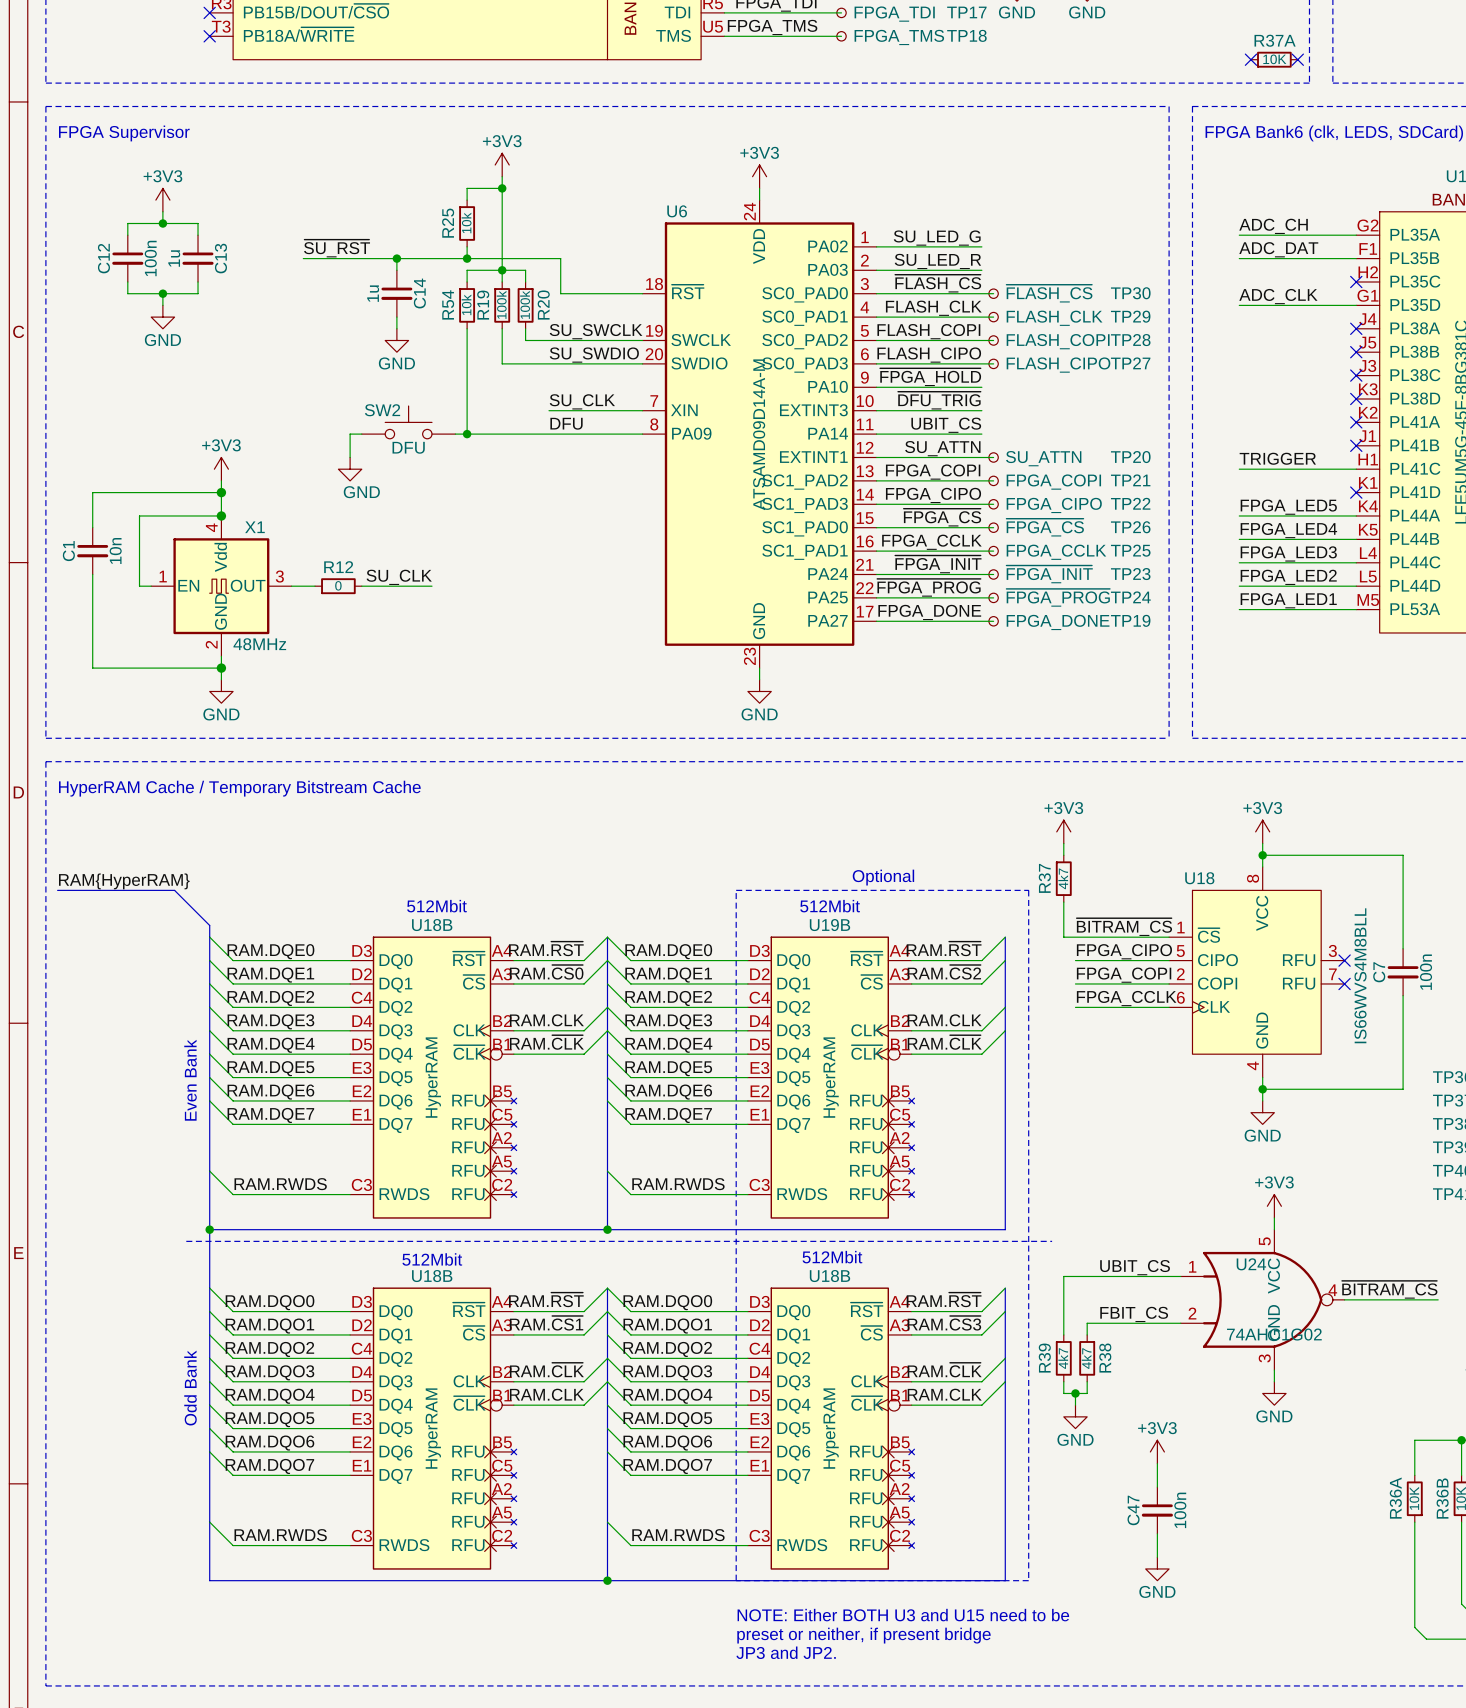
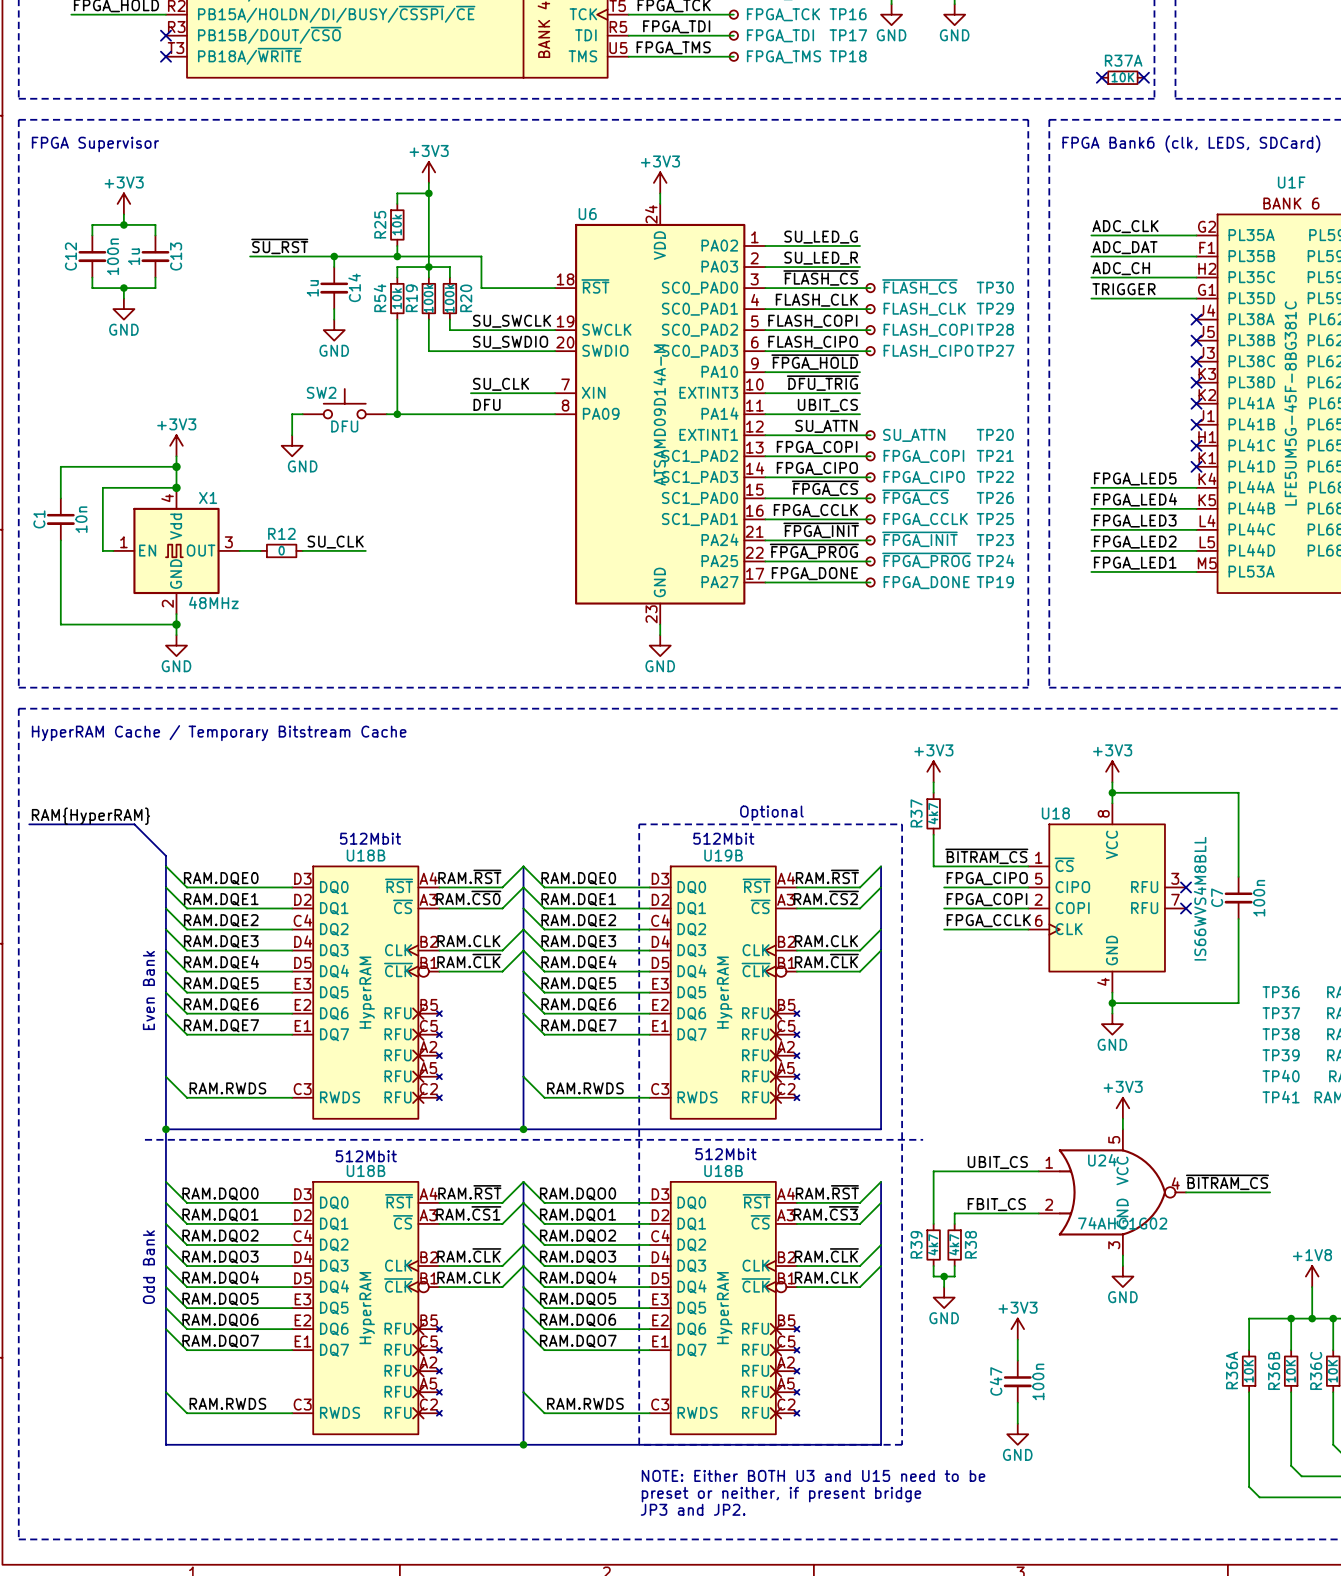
label: ADC_CH (1273, 226) -> ADC_CLK (1125, 226)
label: none -> ADC_CH (1121, 268)
no-connect mark: (1356, 282) -> none
label: ADC_CLK (1278, 296) -> TRIGGER (1123, 289)
label: TRIGGER (1277, 458) -> none
wire: (1239, 469) (1356, 469) -> (1091, 277) (1196, 277)
no-connect mark: none -> (1196, 445)

